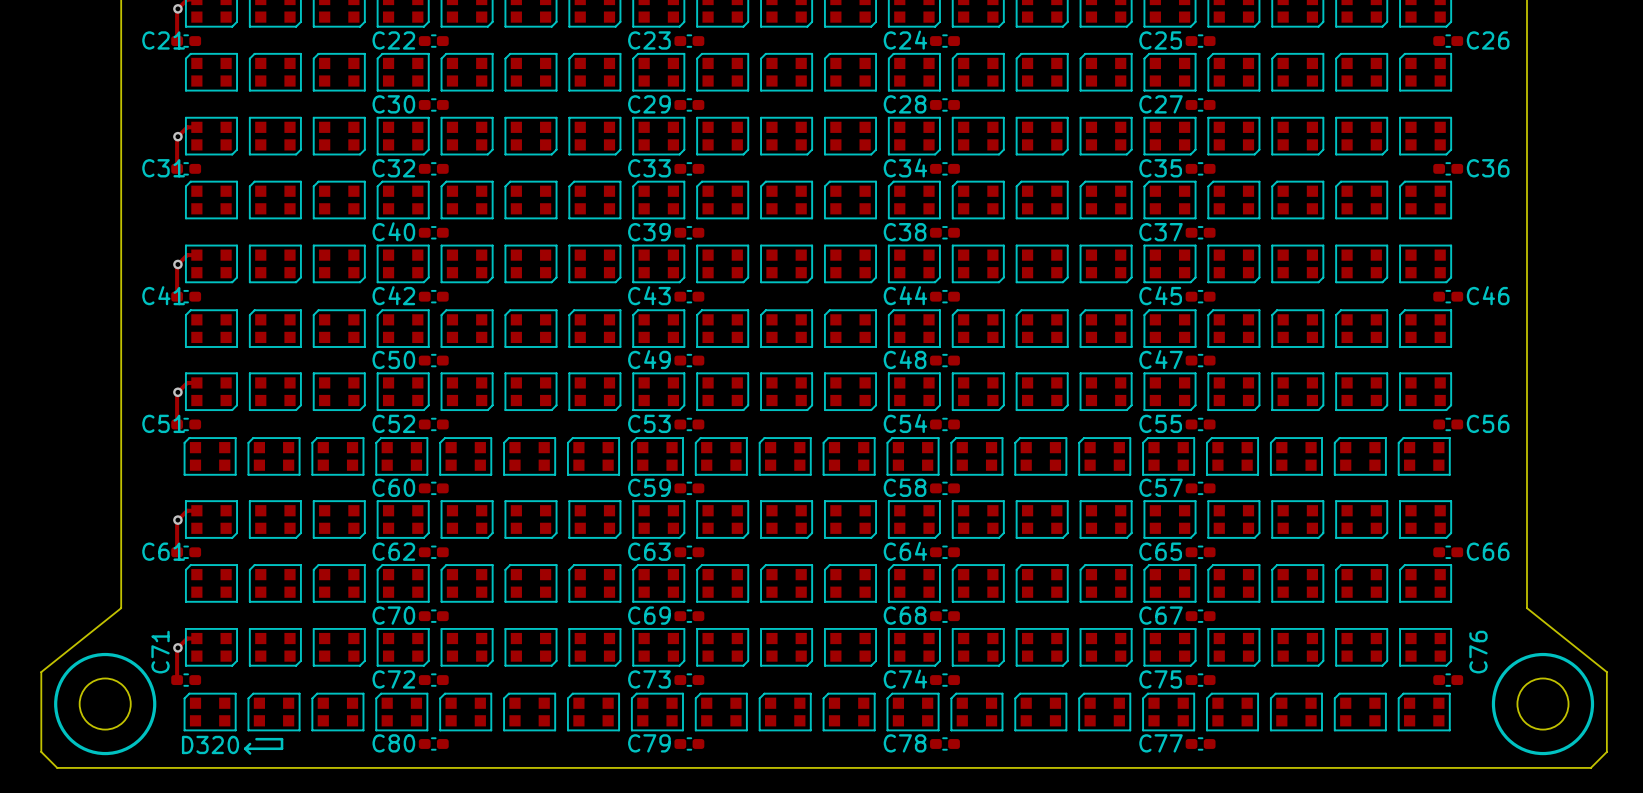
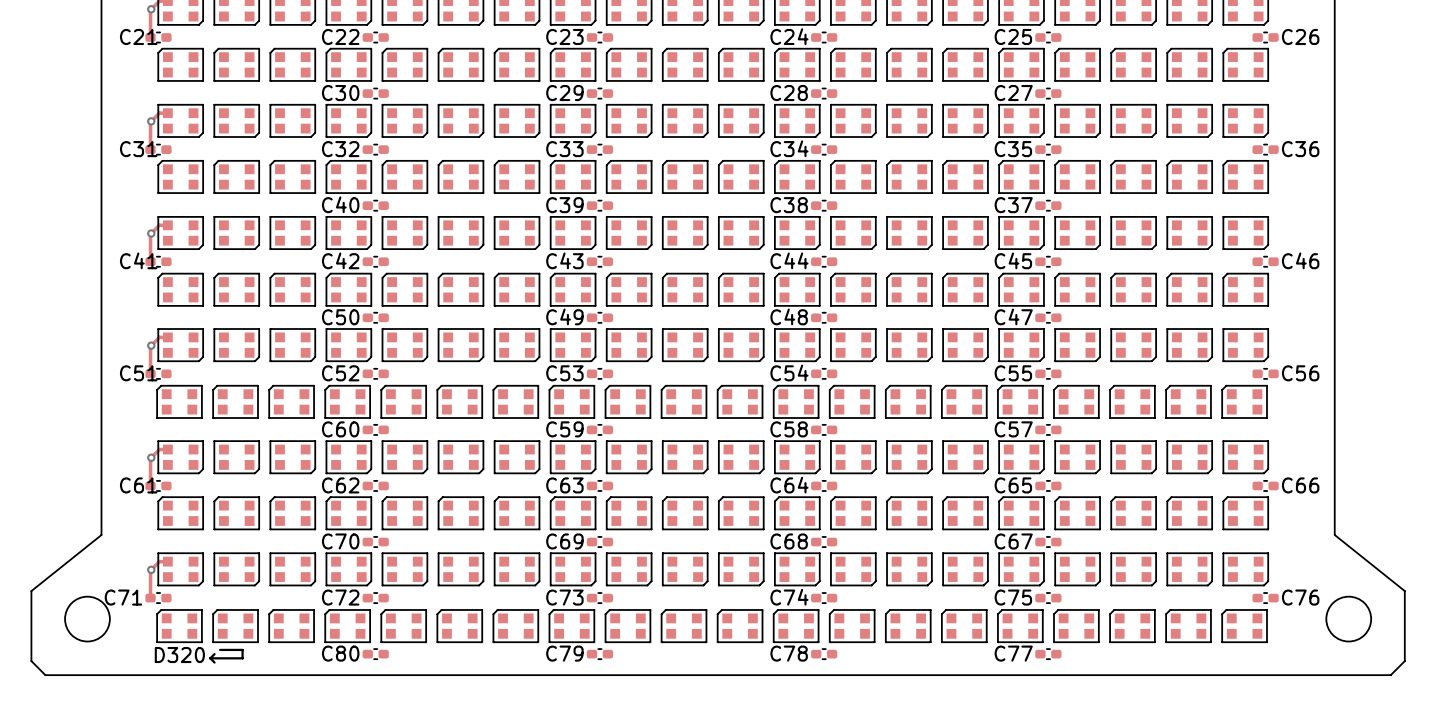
drawing: [54, 652, 157, 756] -> none
C71 name rotation: 0° (160, 652) -> 90° clockwise (123, 597)
C76 name rotation: 0° (1478, 652) -> 90° clockwise (1300, 597)
drawing: [1491, 652, 1595, 756] -> none

